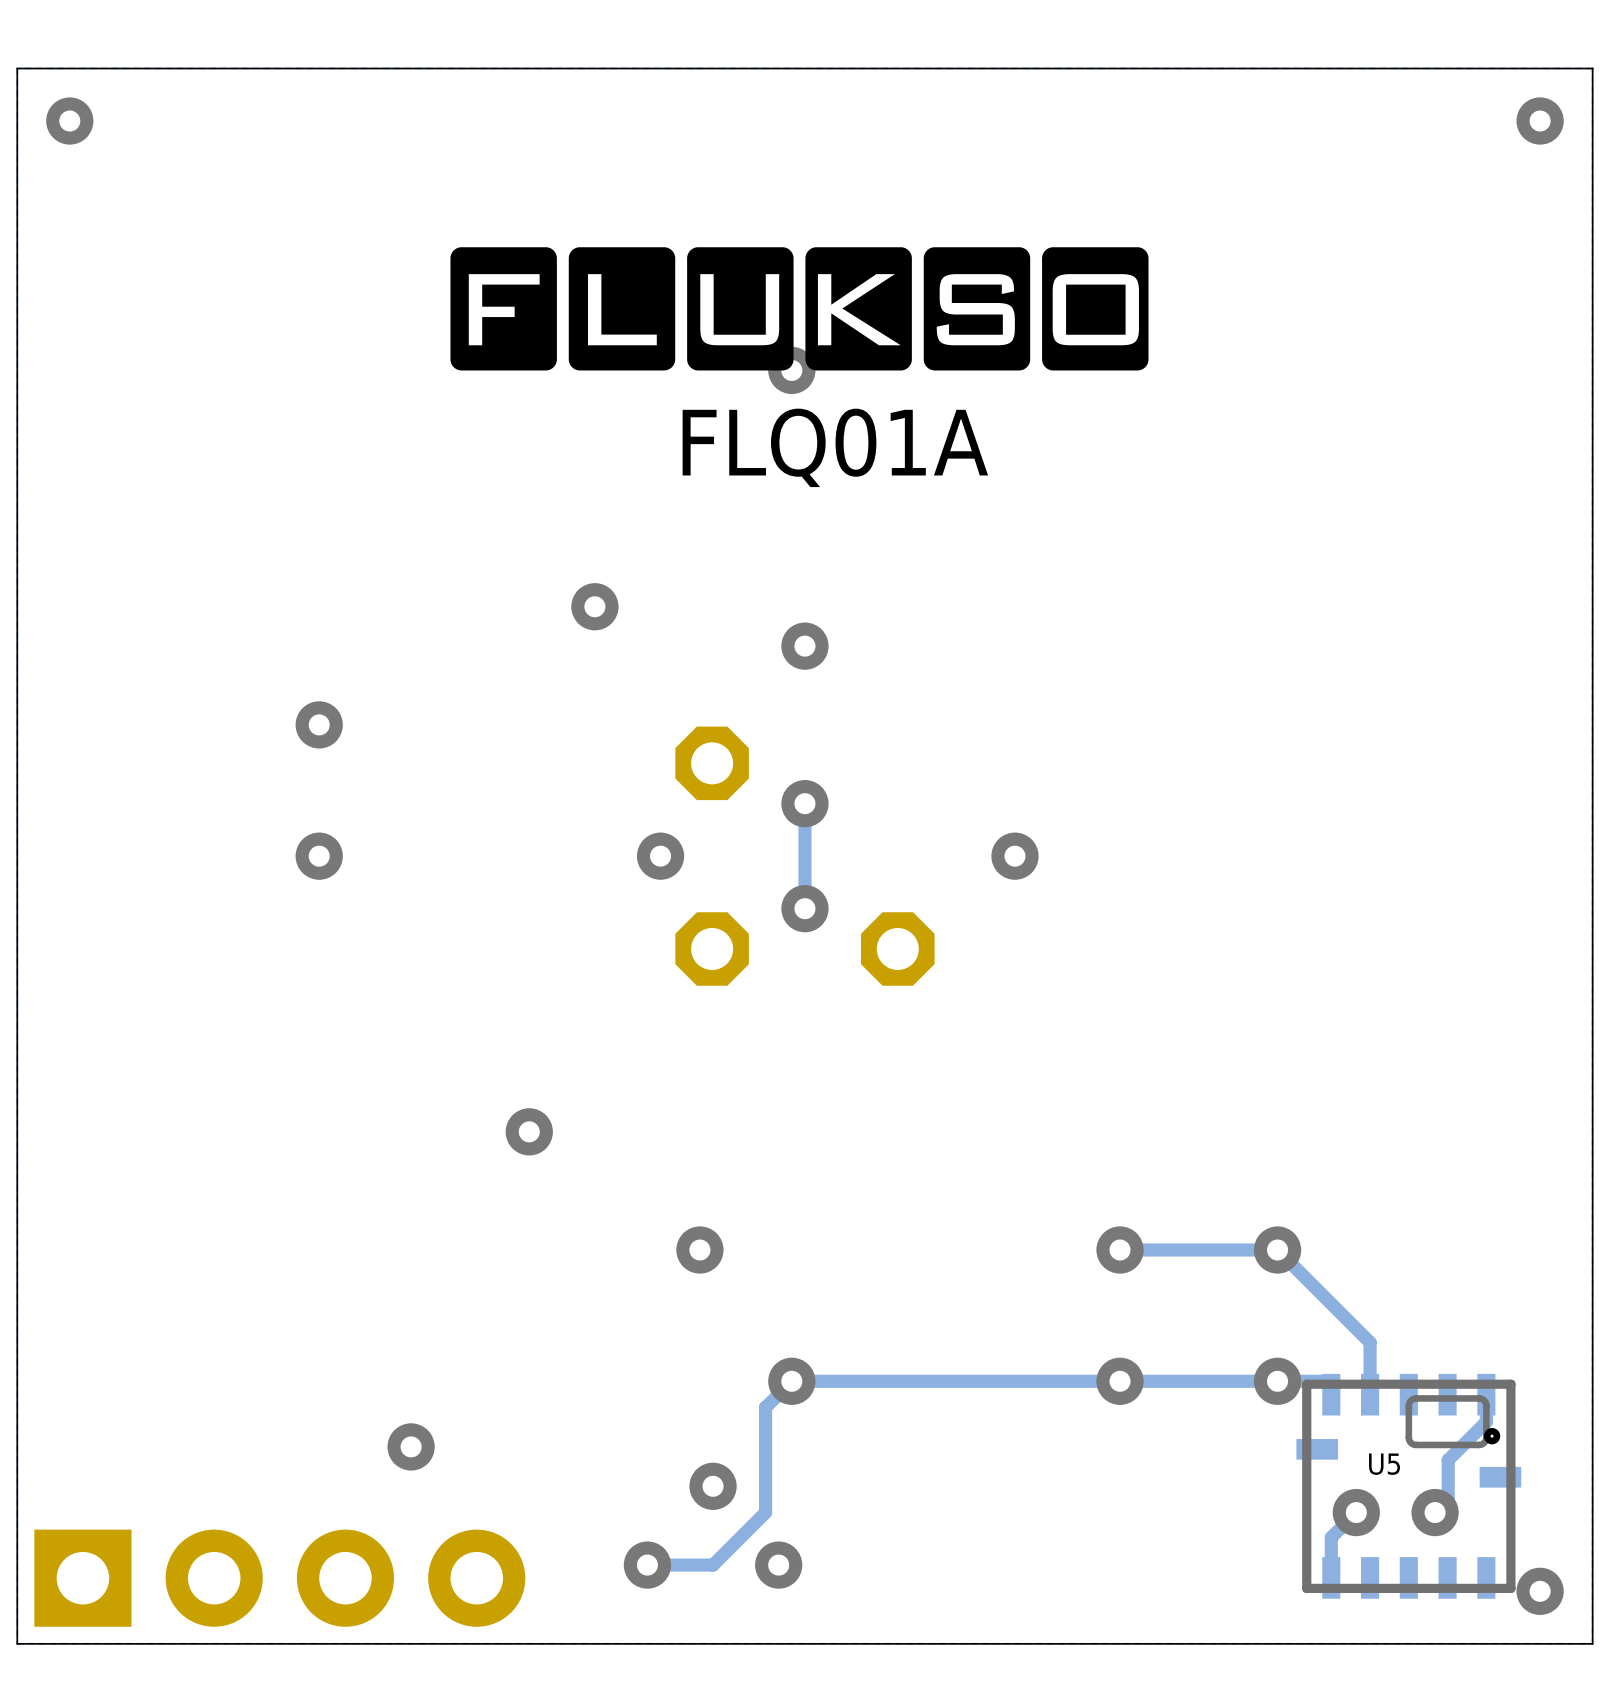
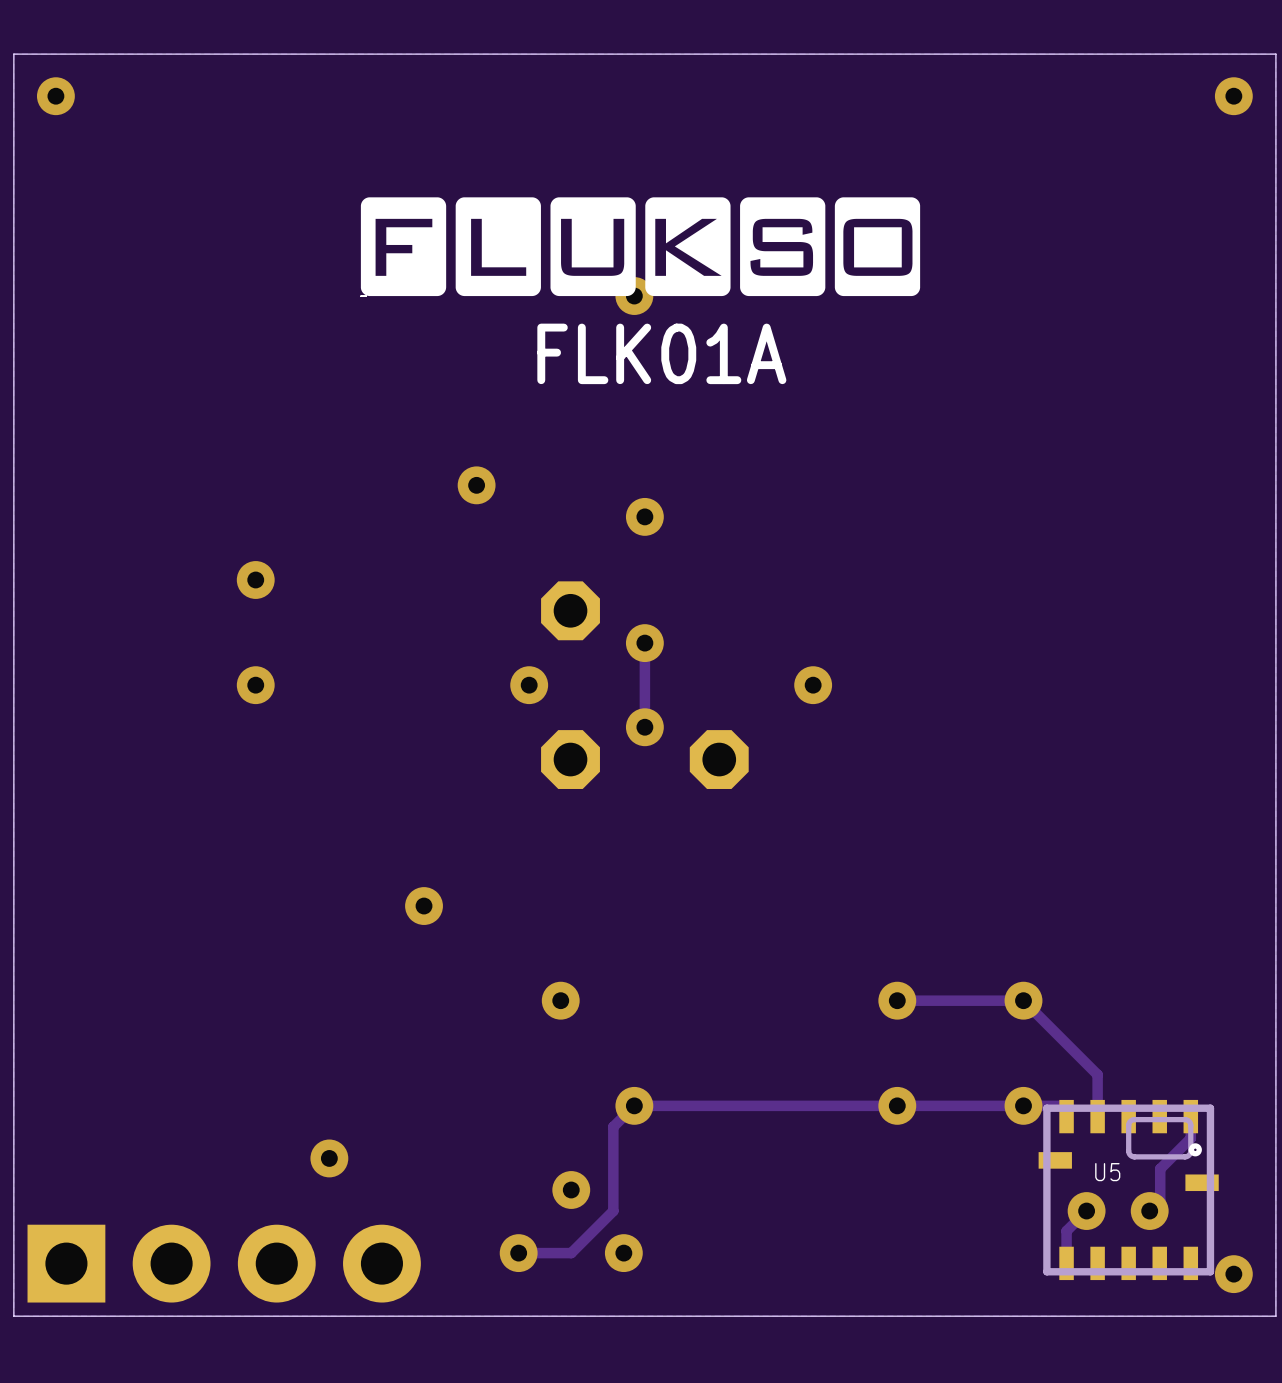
text: FLQ01A (835, 447) -> FLK01A (661, 353)

